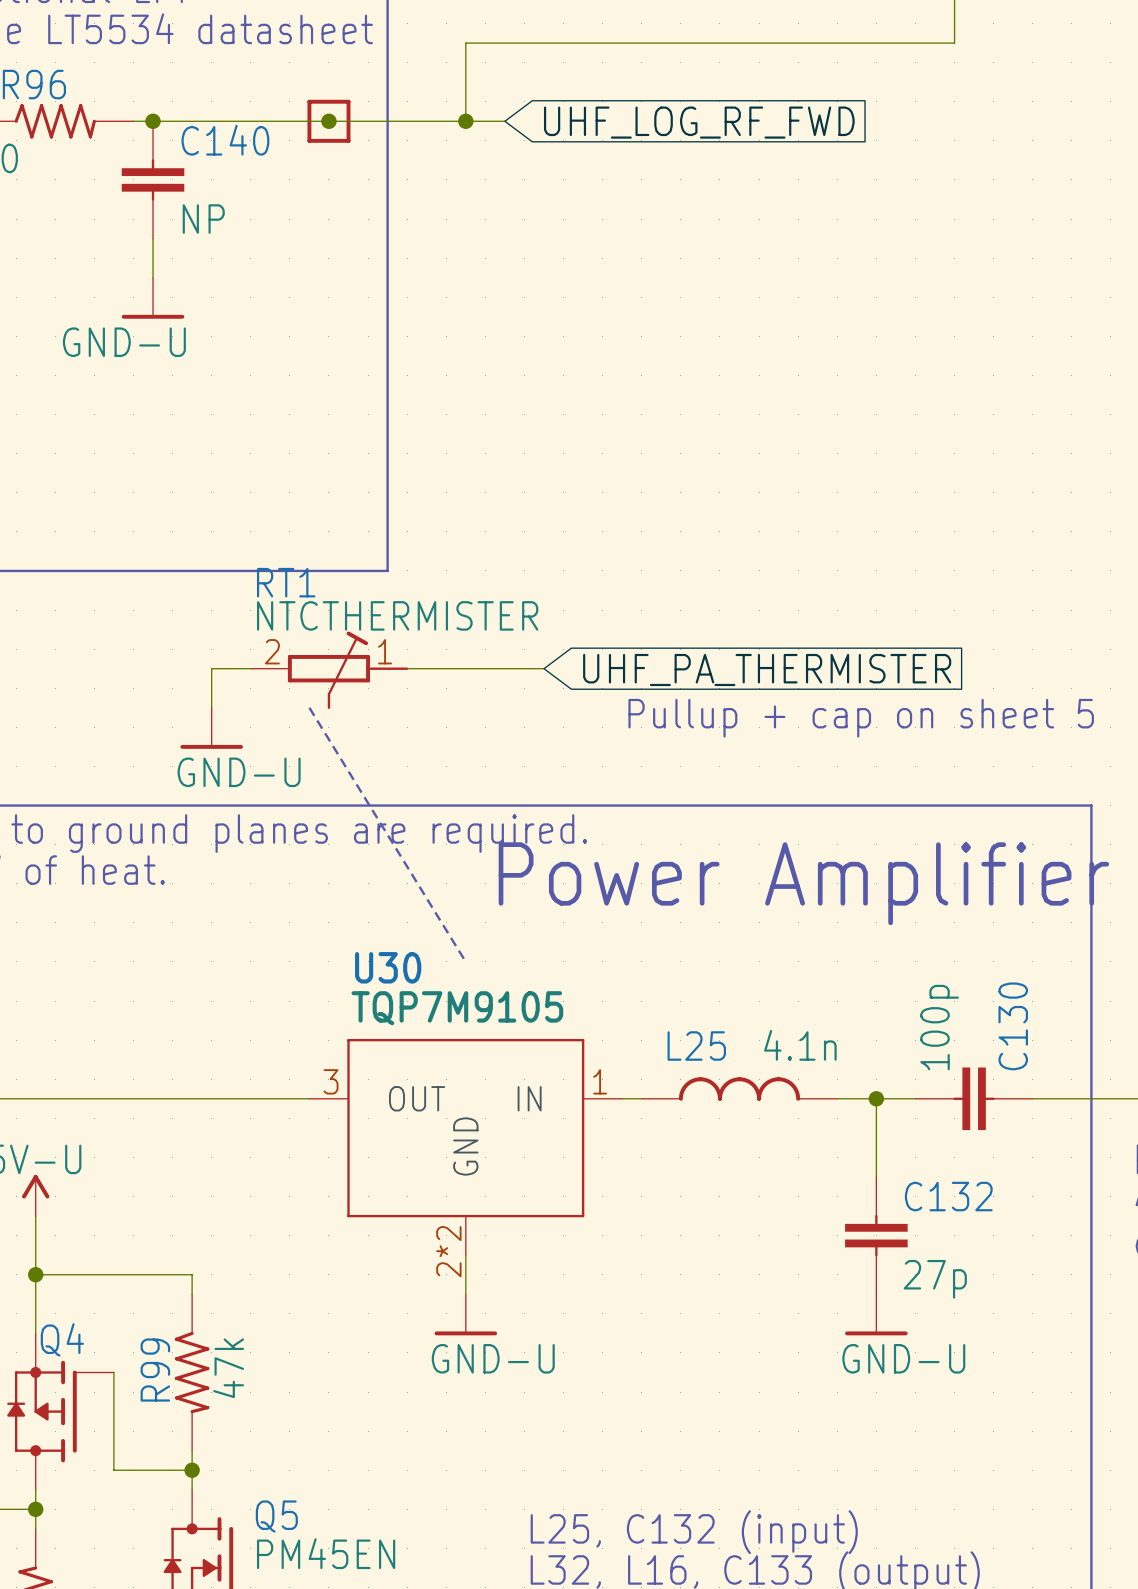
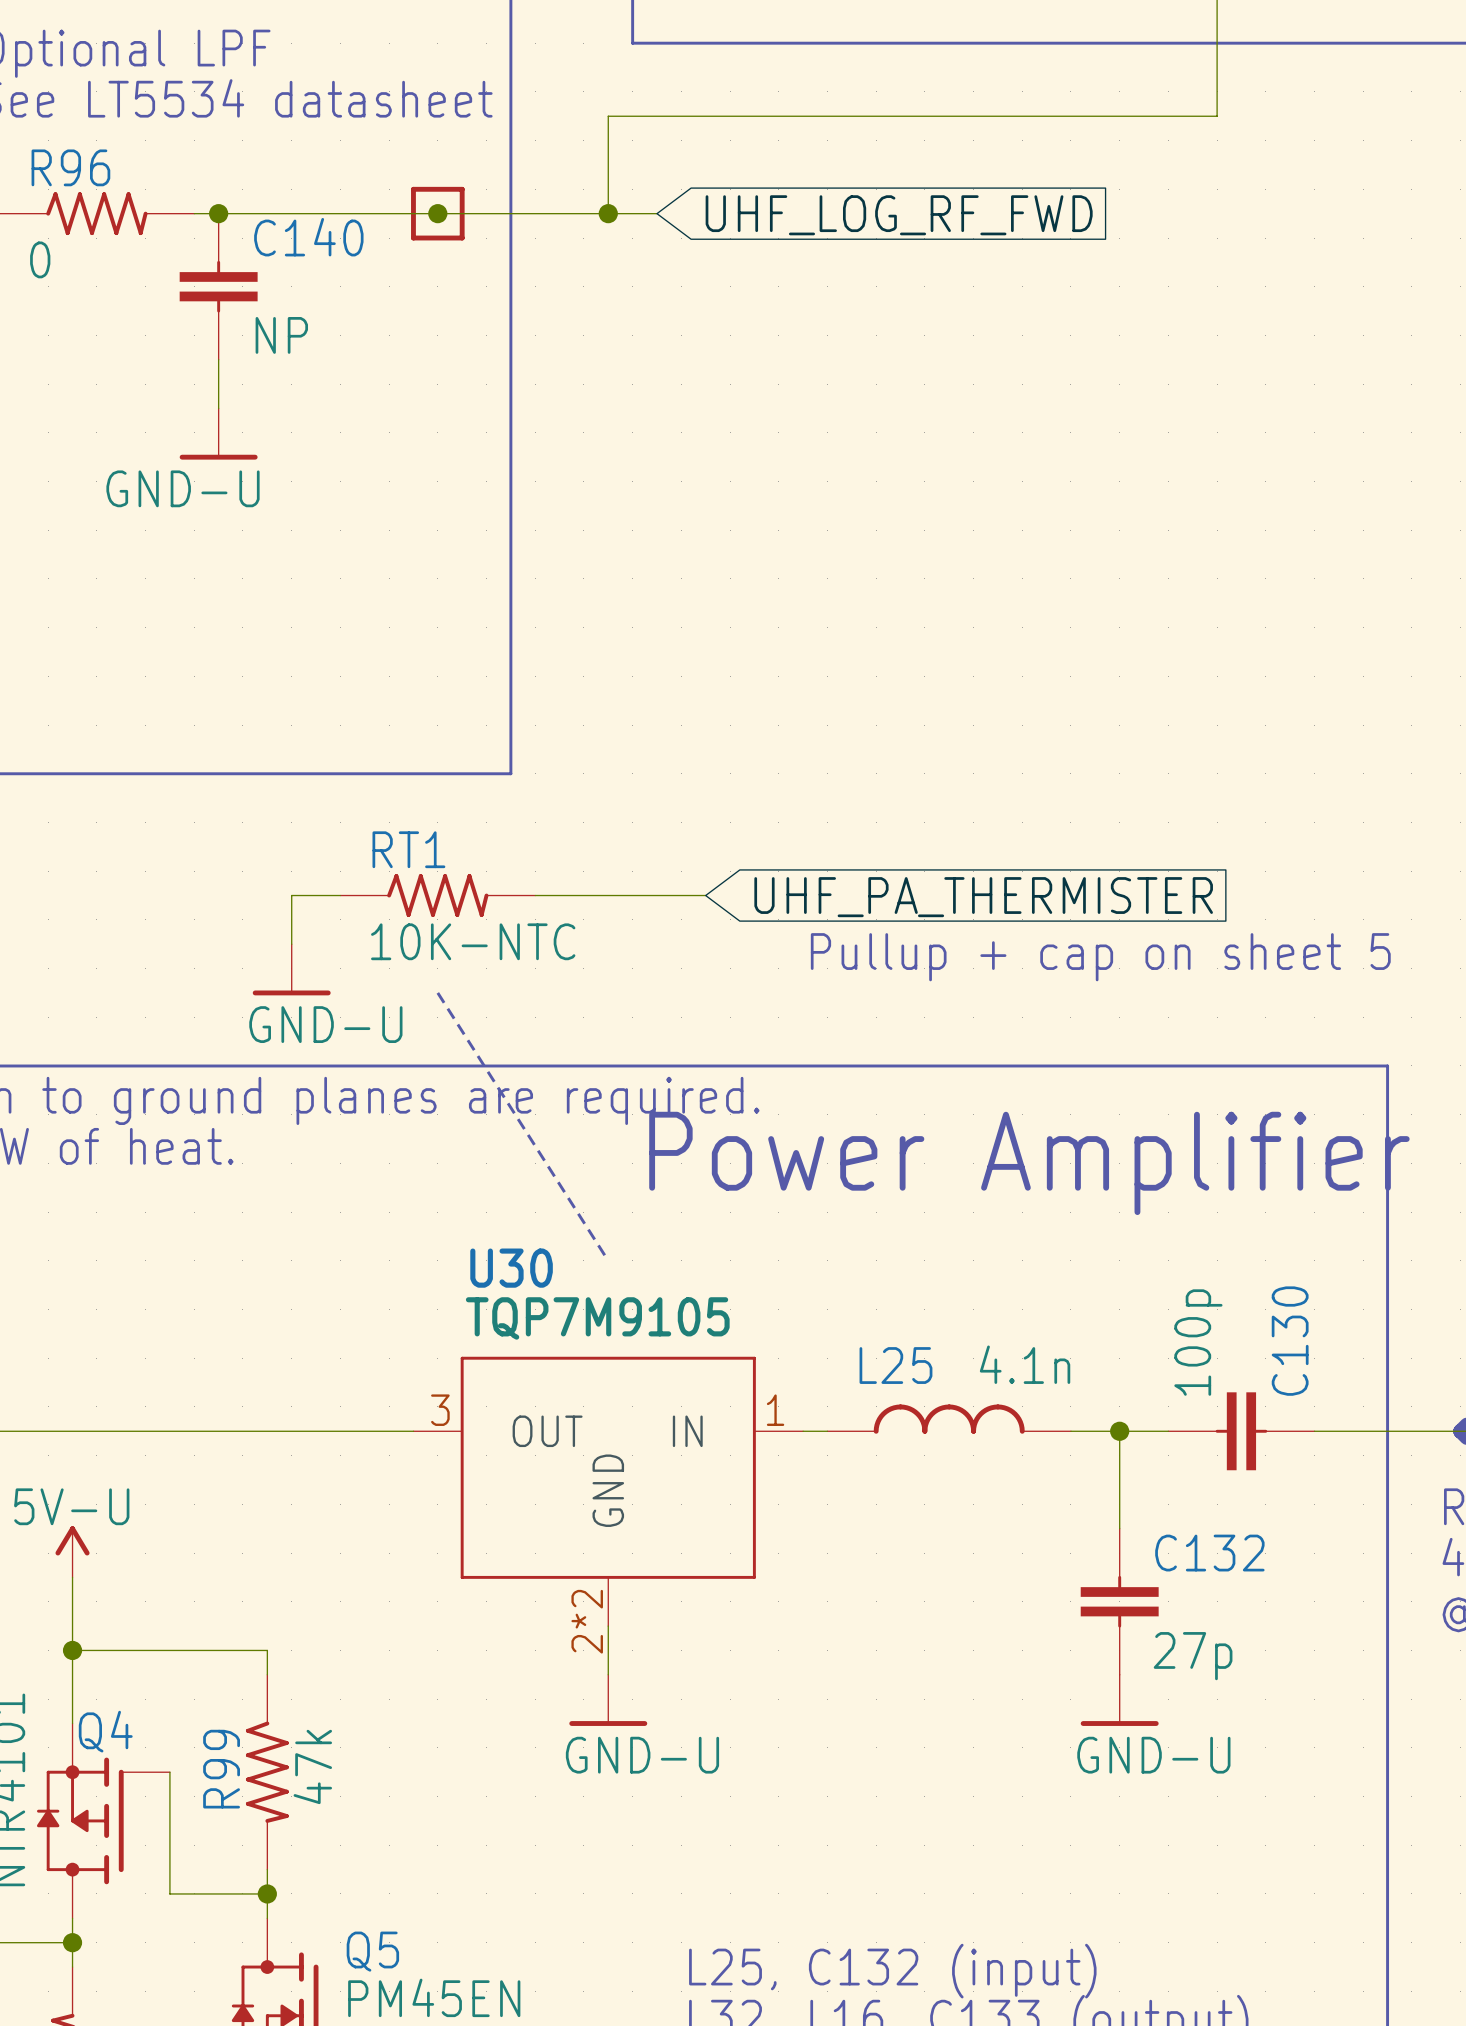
RT1 name position: RT1 (286, 582) -> RT1 (408, 849)
RT1 value: NTCTHERMISTER (397, 615) -> 10K-NTC (473, 941)
RT1 symbol: [250, 631, 409, 709] -> [340, 874, 536, 917]
line: (309, 707) (465, 961) -> (437, 992) (608, 1260)

